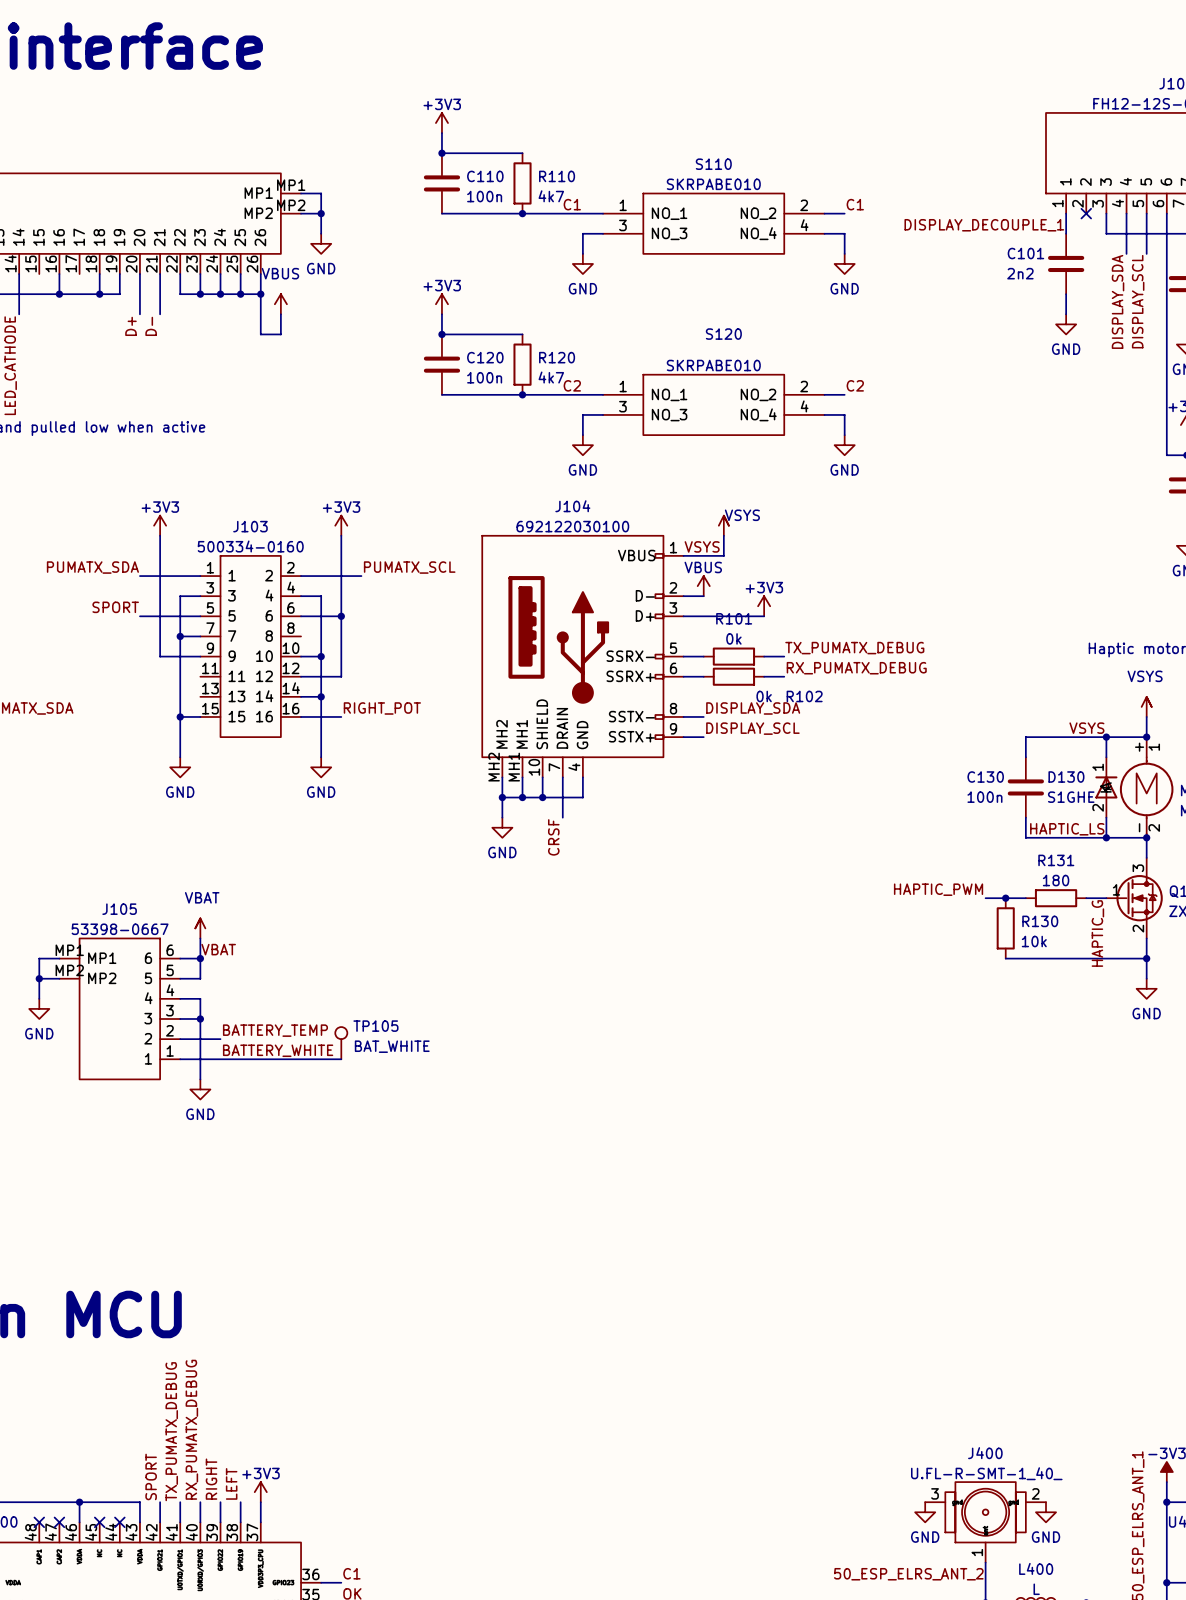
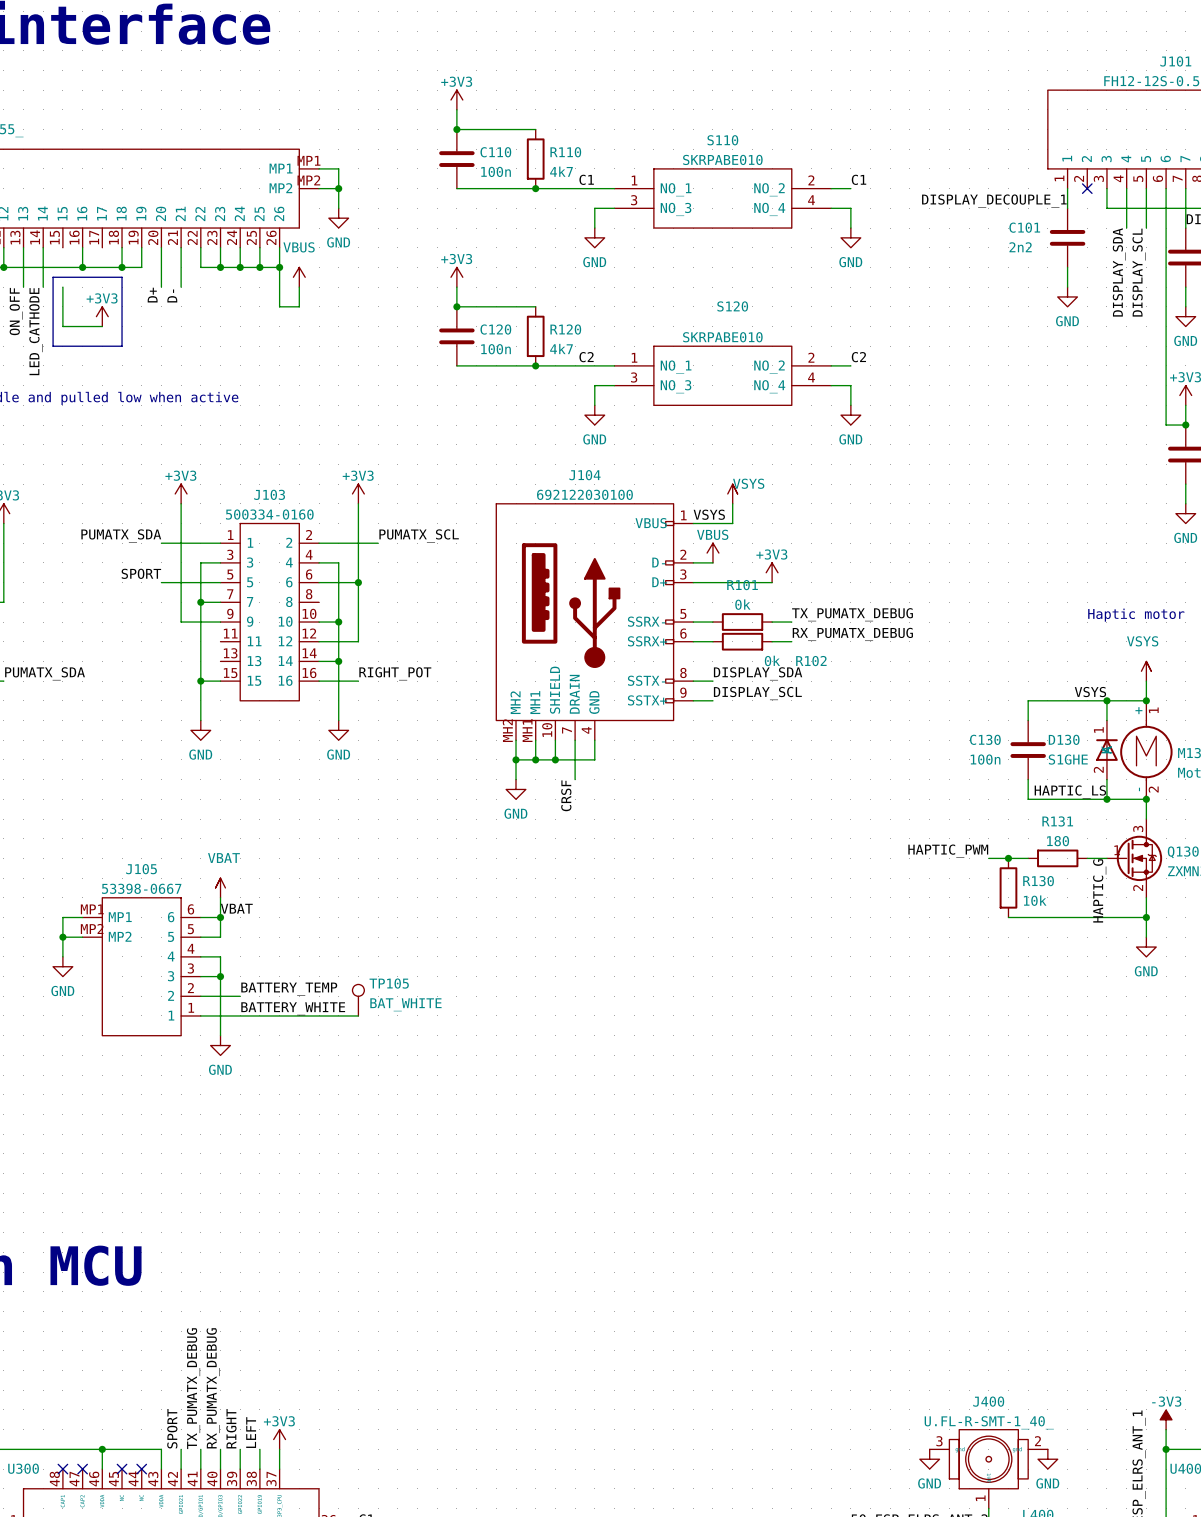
line: none -> (53, 277) (53, 346) (122, 346) (122, 277) (53, 277)
wire: none -> (62, 287) (62, 326) (102, 326)
power symbol: none -> +3V3 (102, 316)

